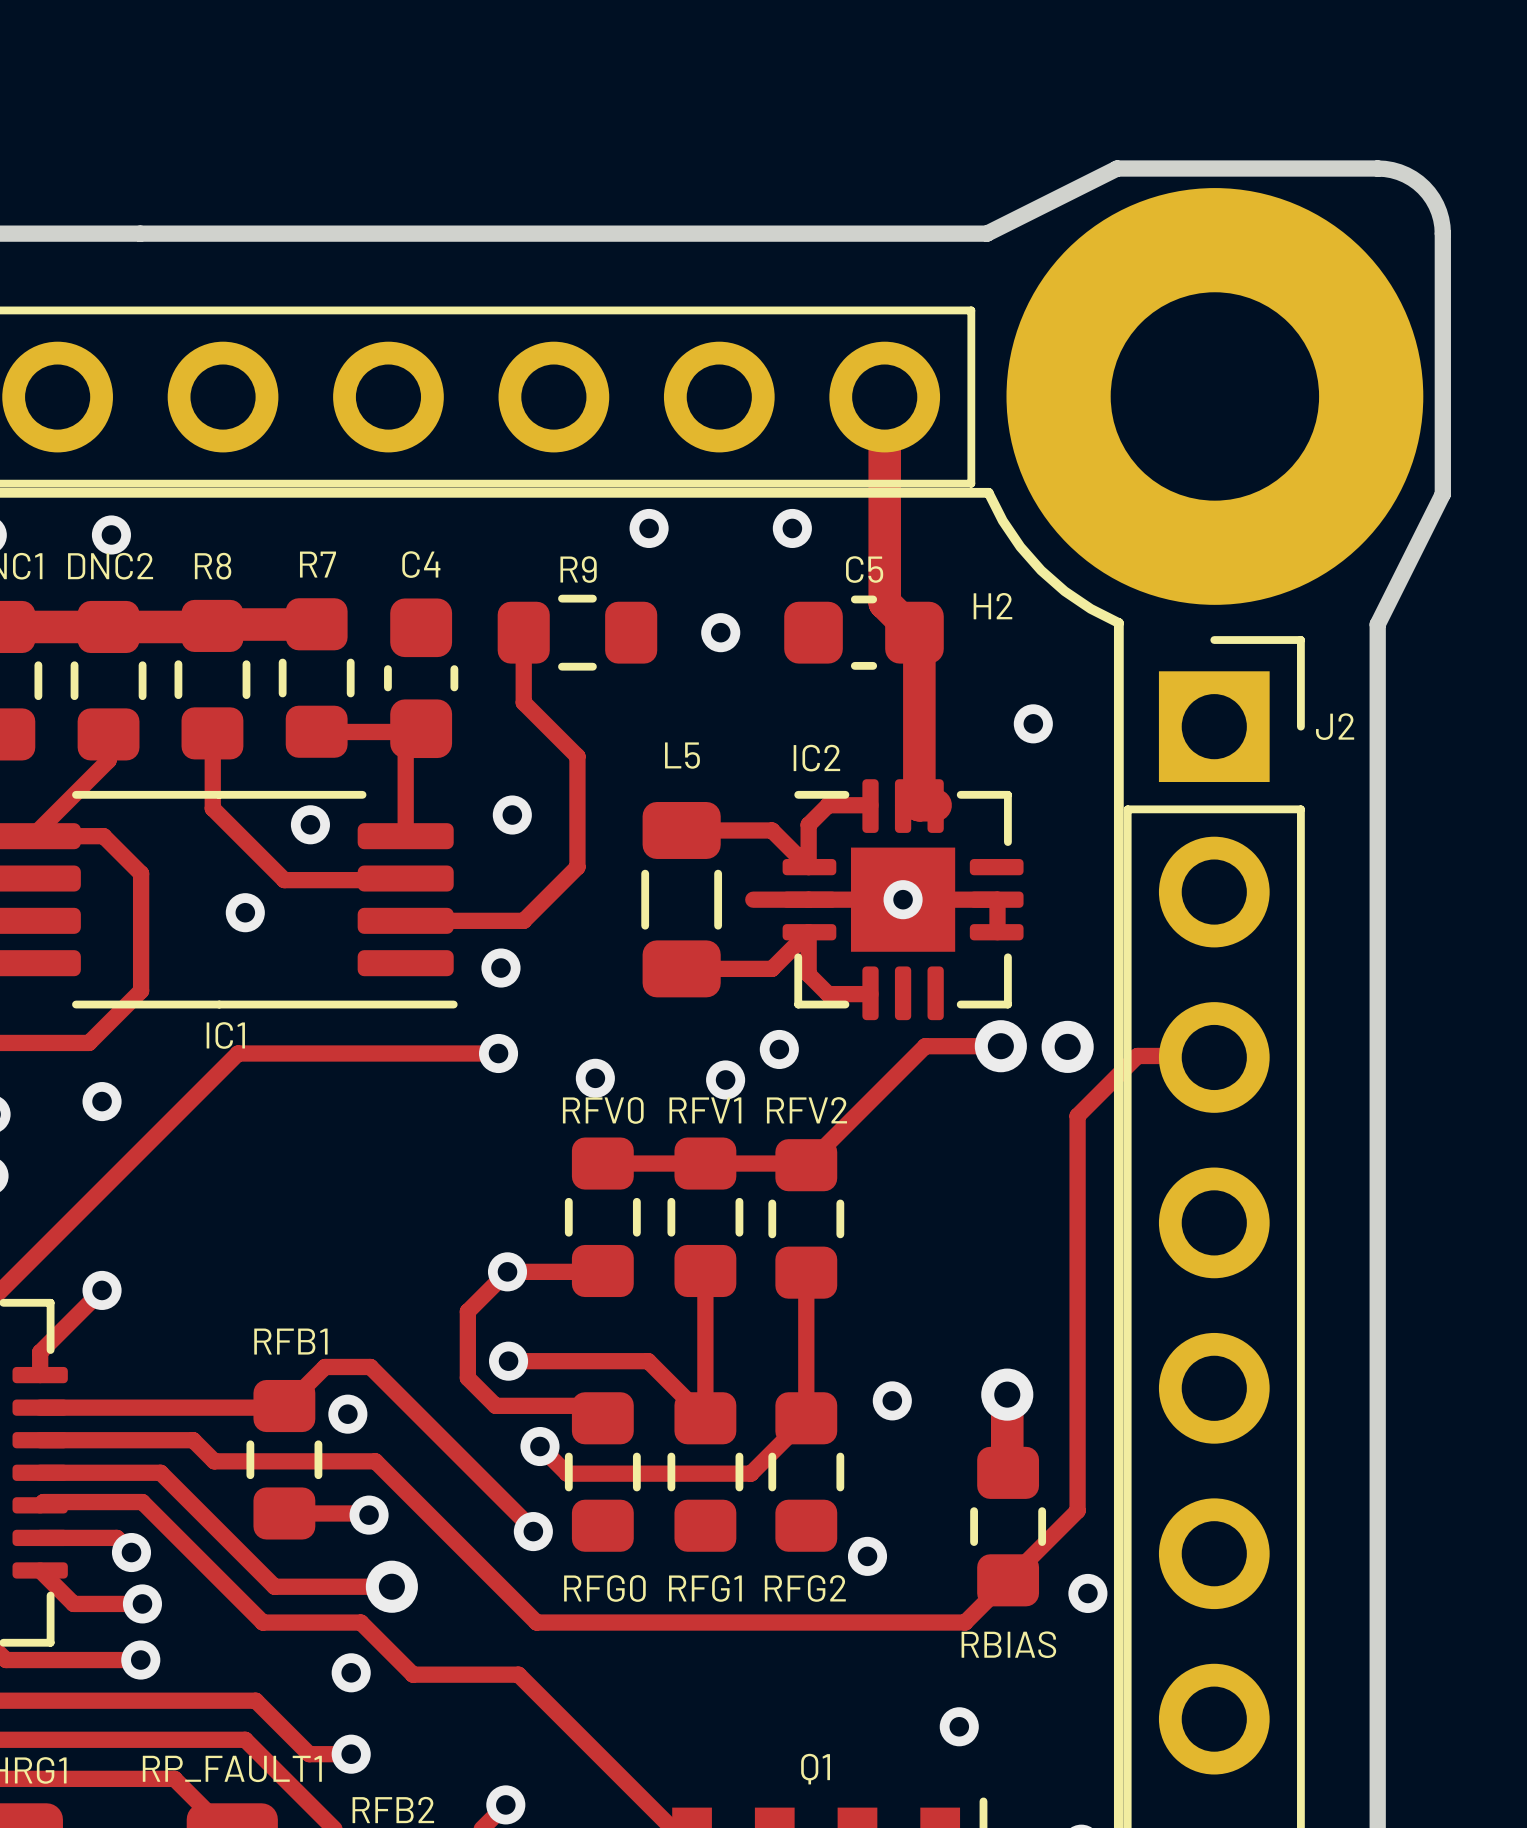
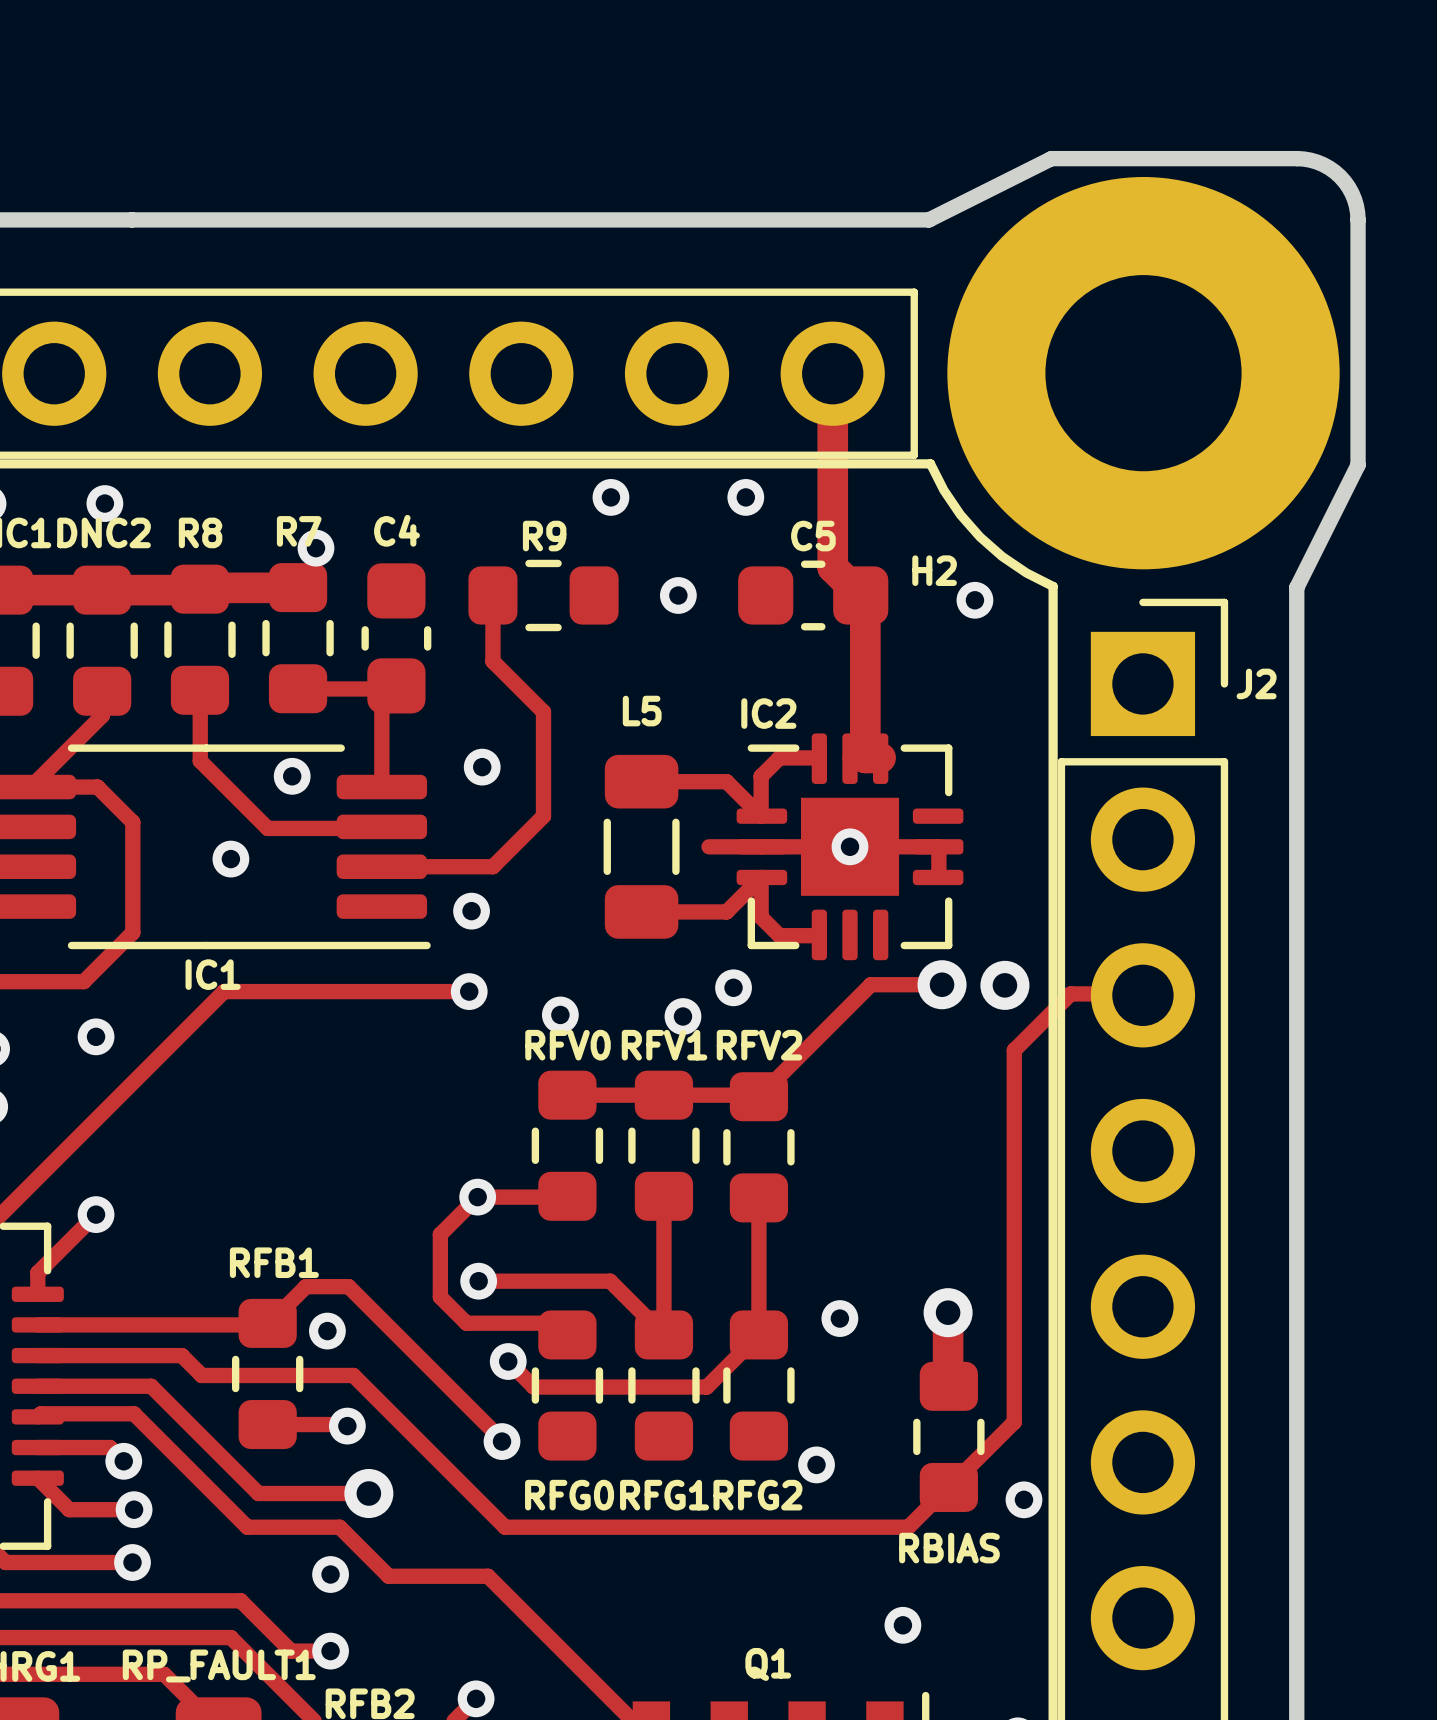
via: none -> (315, 548)
via position: (1033, 723) -> (974, 600)

